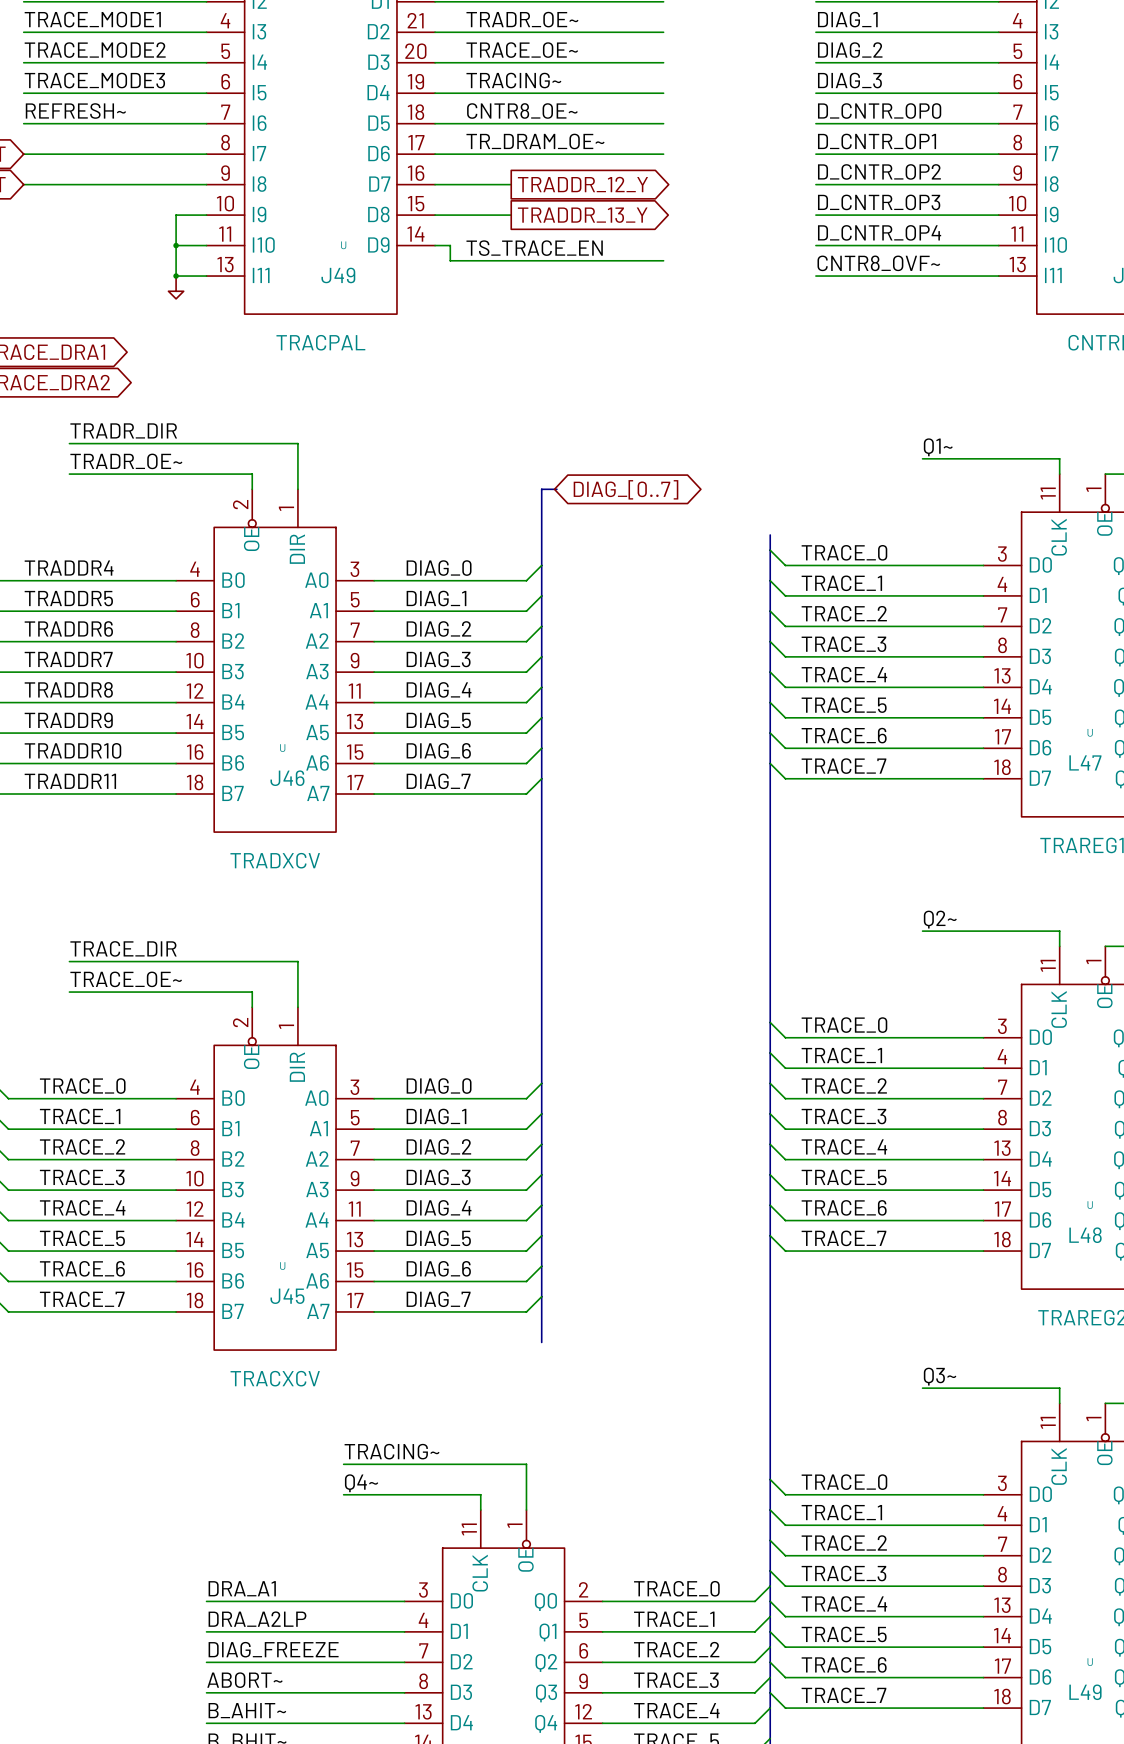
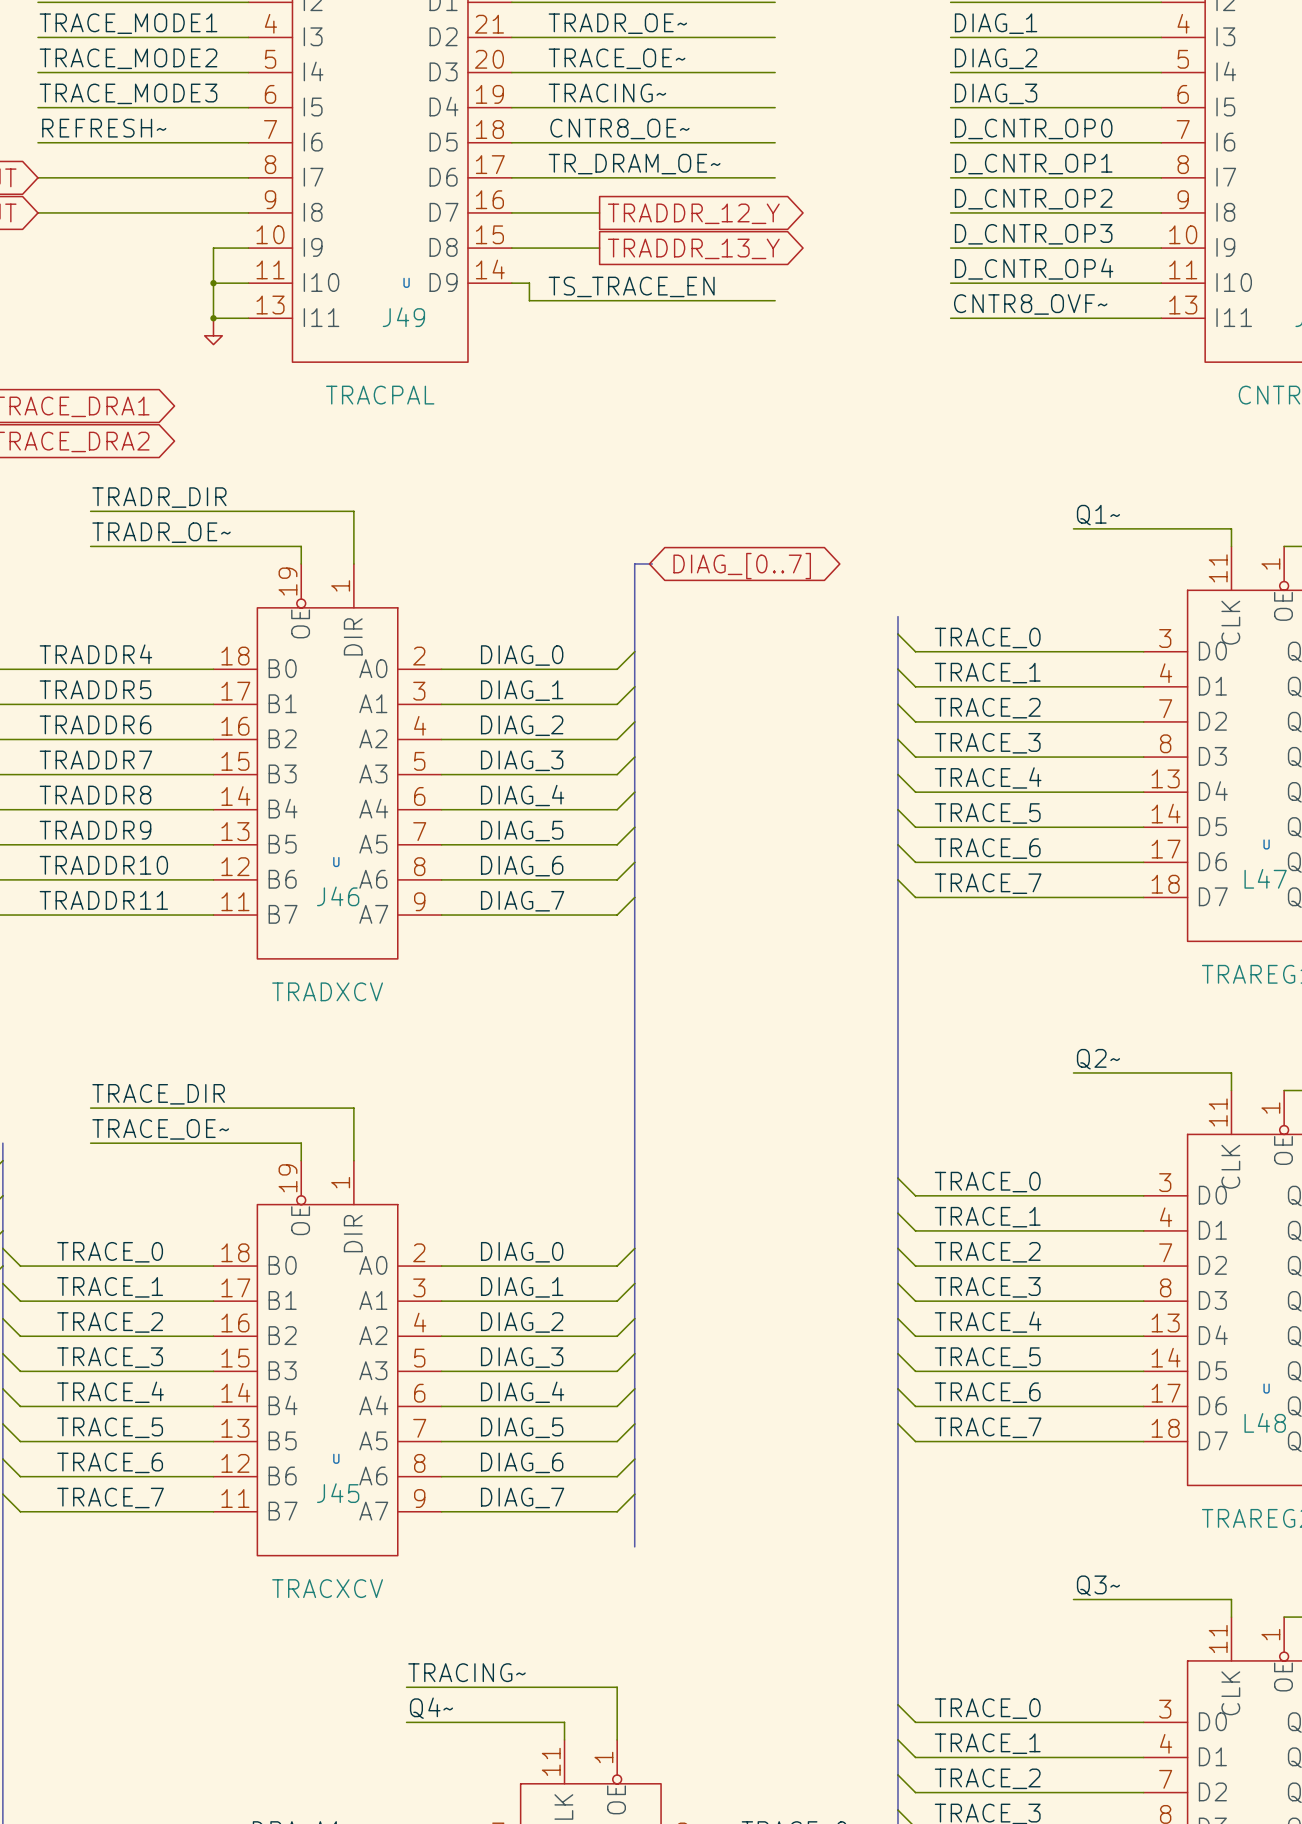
U symbol: [176, 489, 375, 833] -> [213, 563, 442, 959]
U symbol: [176, 1007, 375, 1351] -> [213, 1160, 442, 1556]

